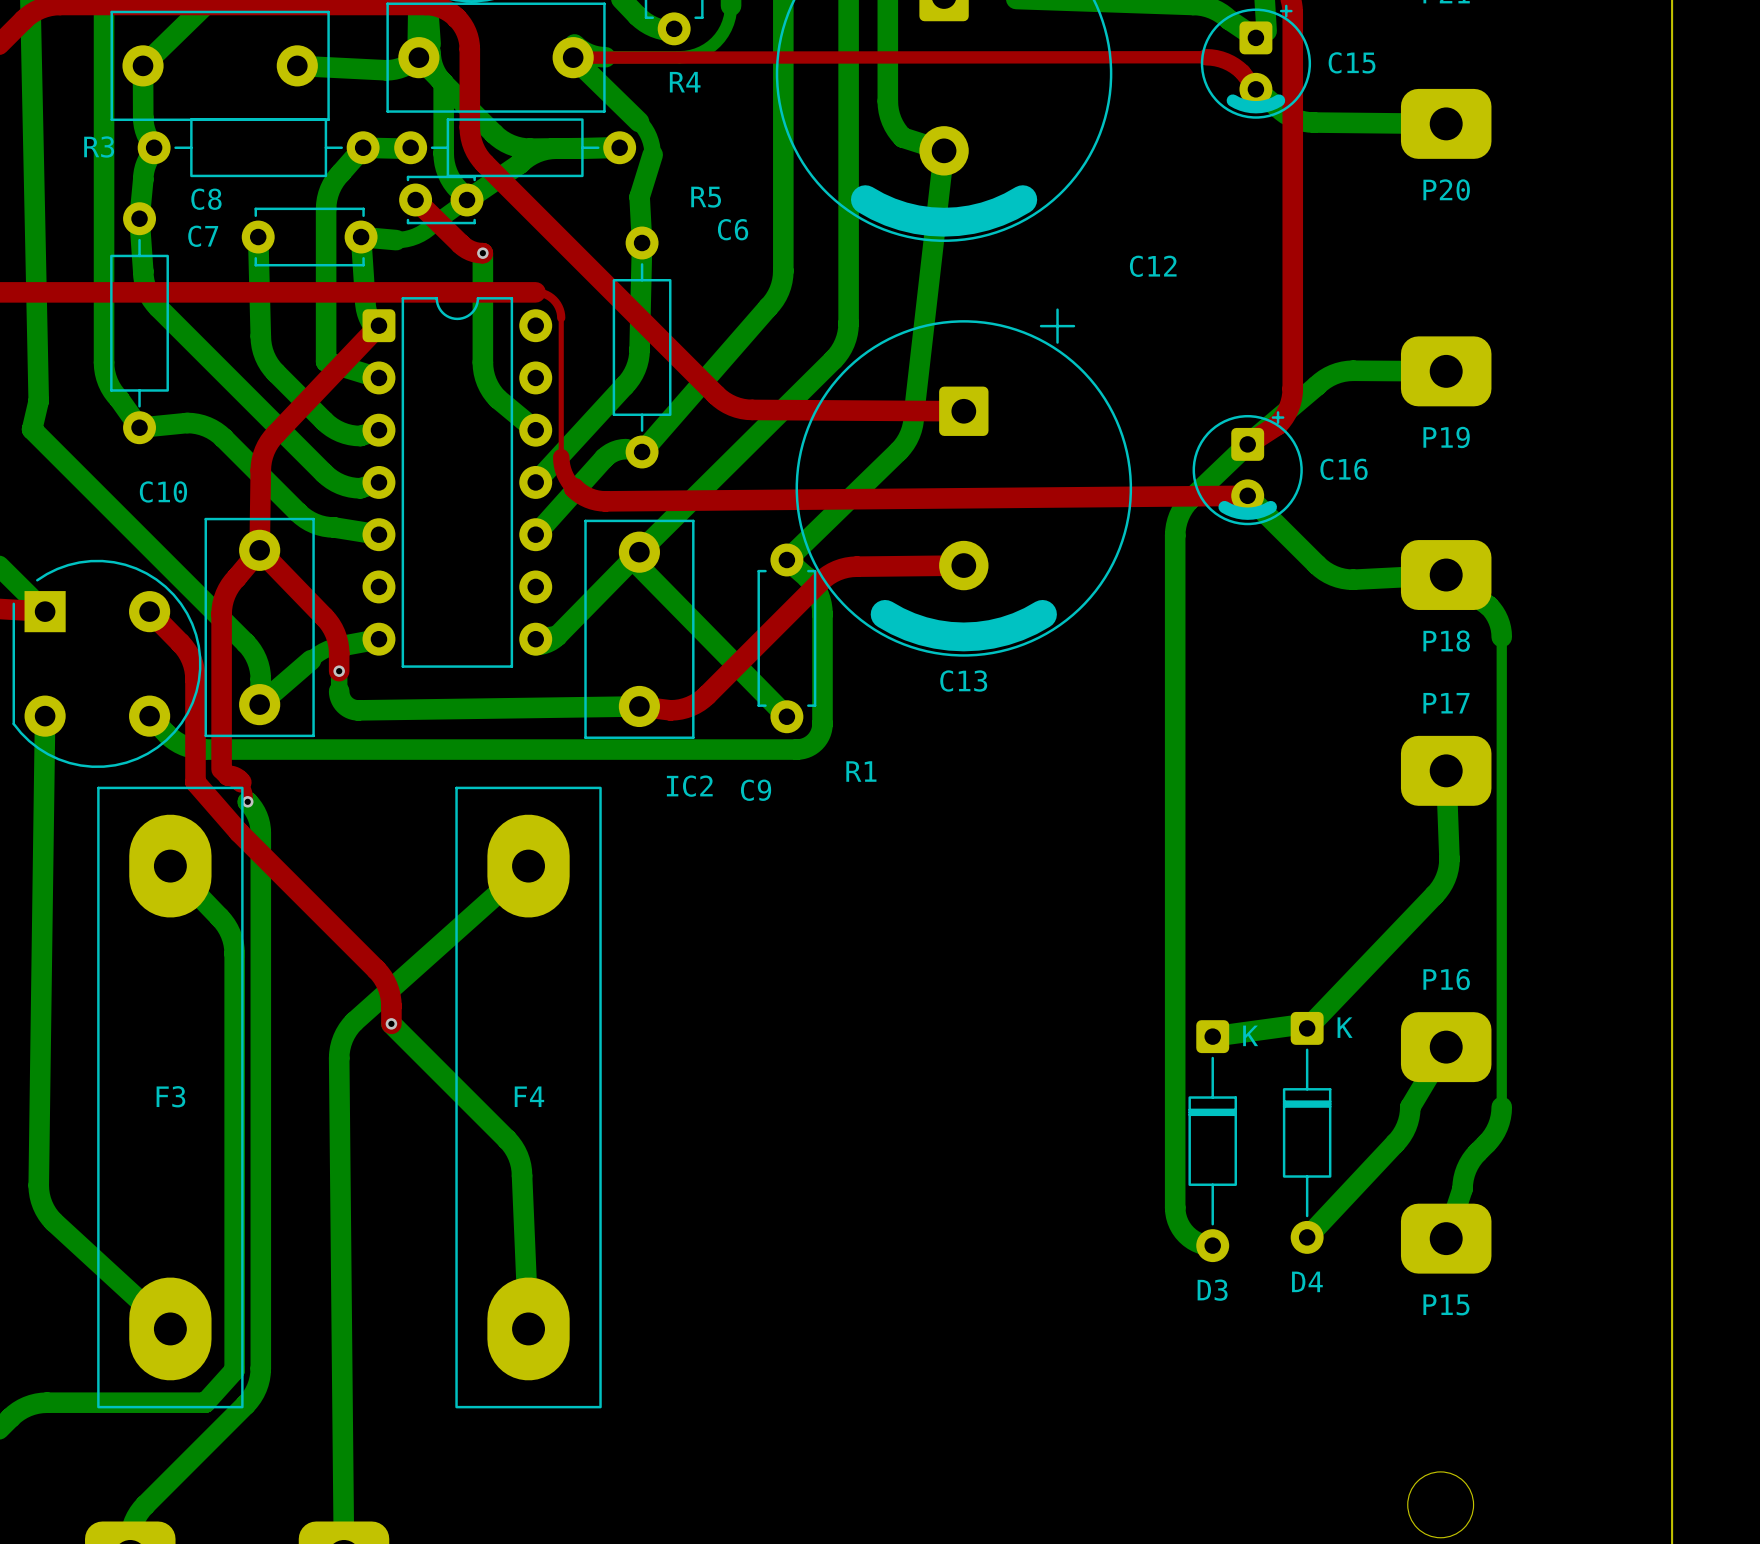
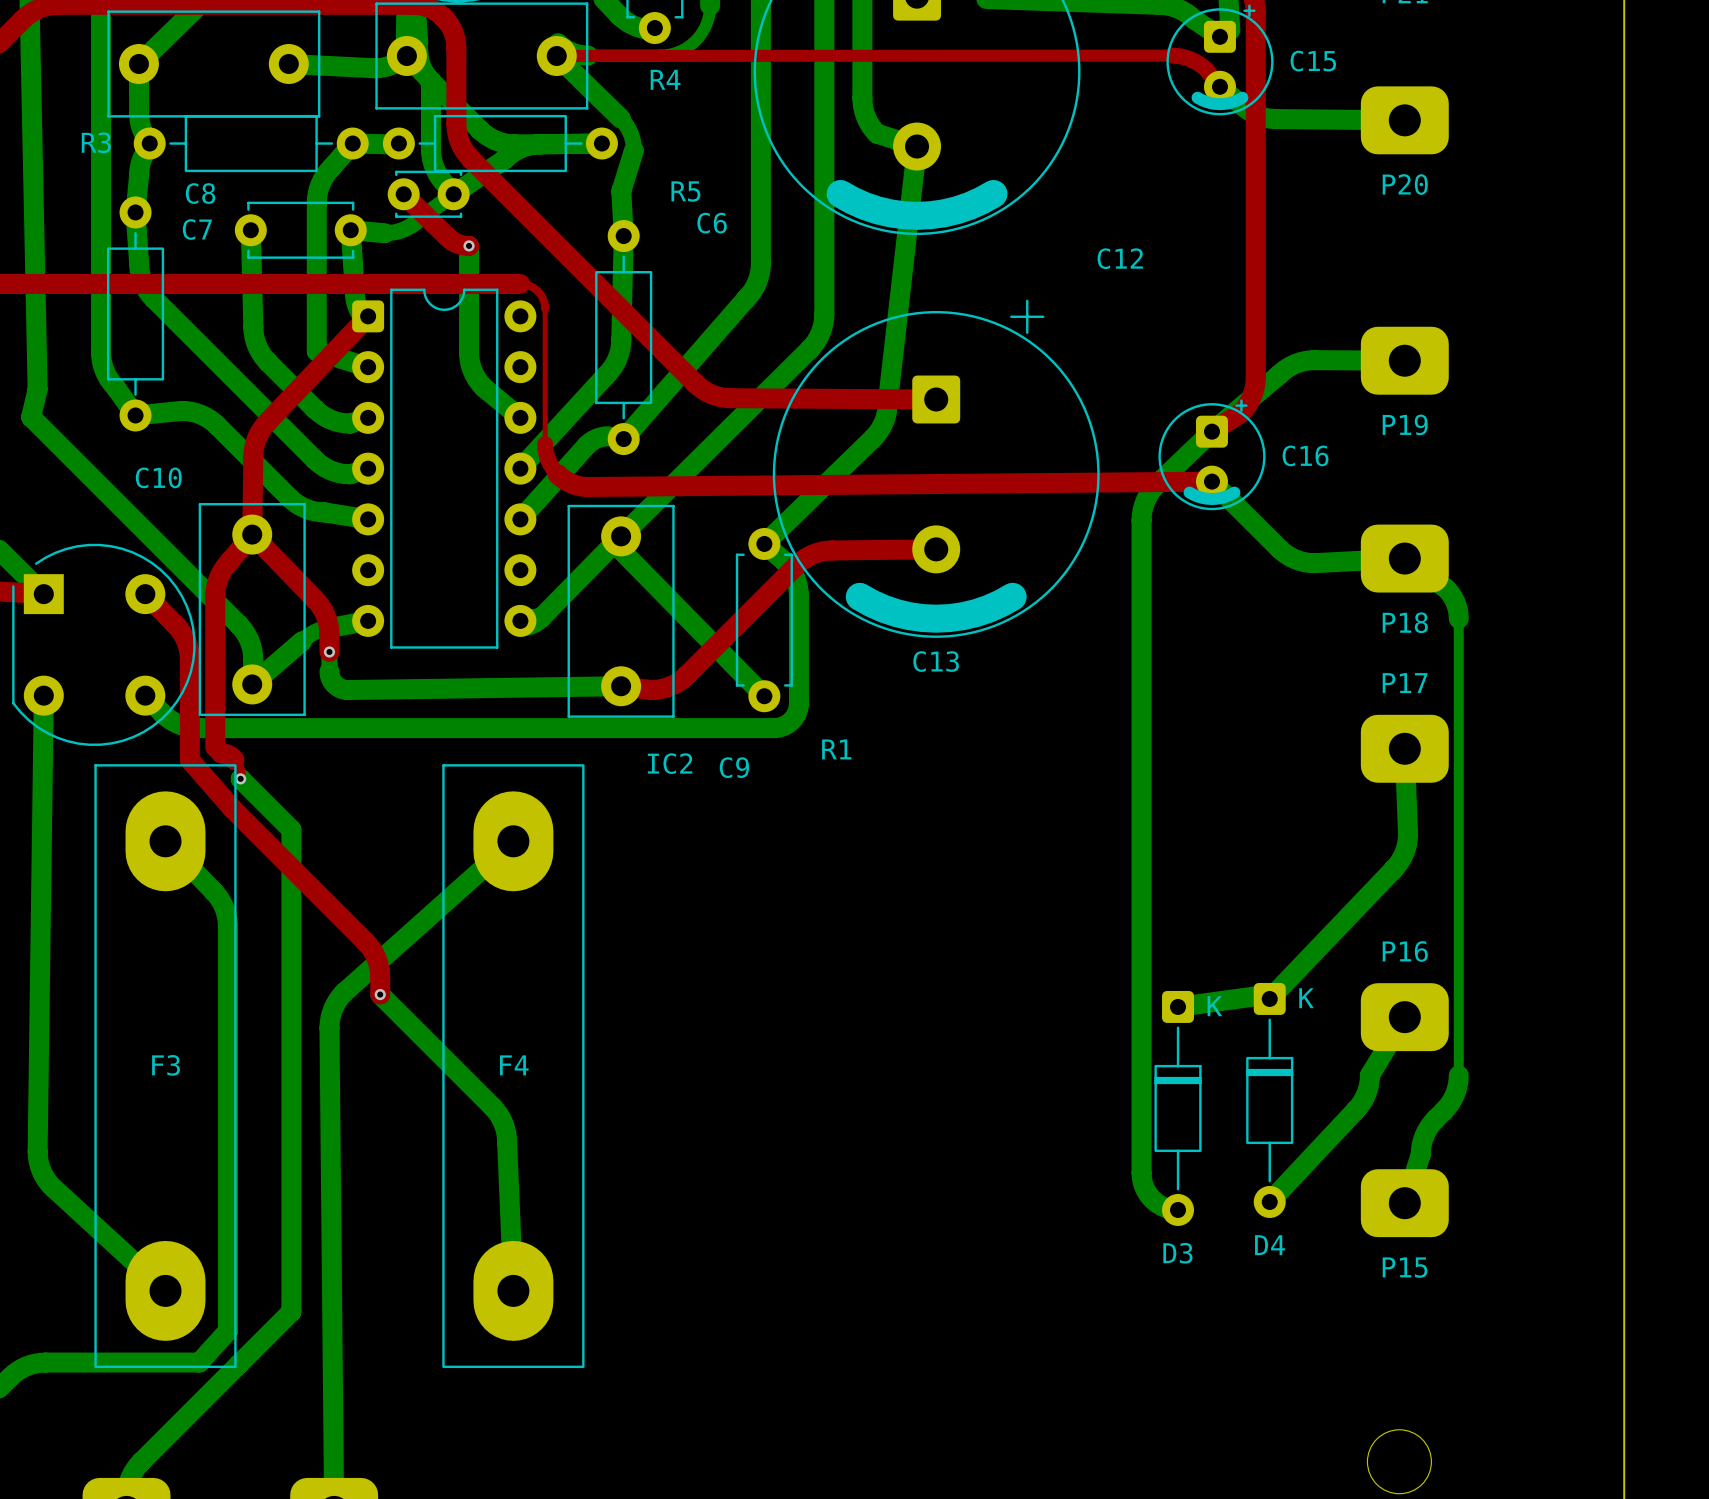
bottom track: (247, 802) (257, 816) (260, 832) (260, 1368) (256, 1388) (245, 1404) -> (240, 779) (291, 829) (291, 1311) (238, 1364)

